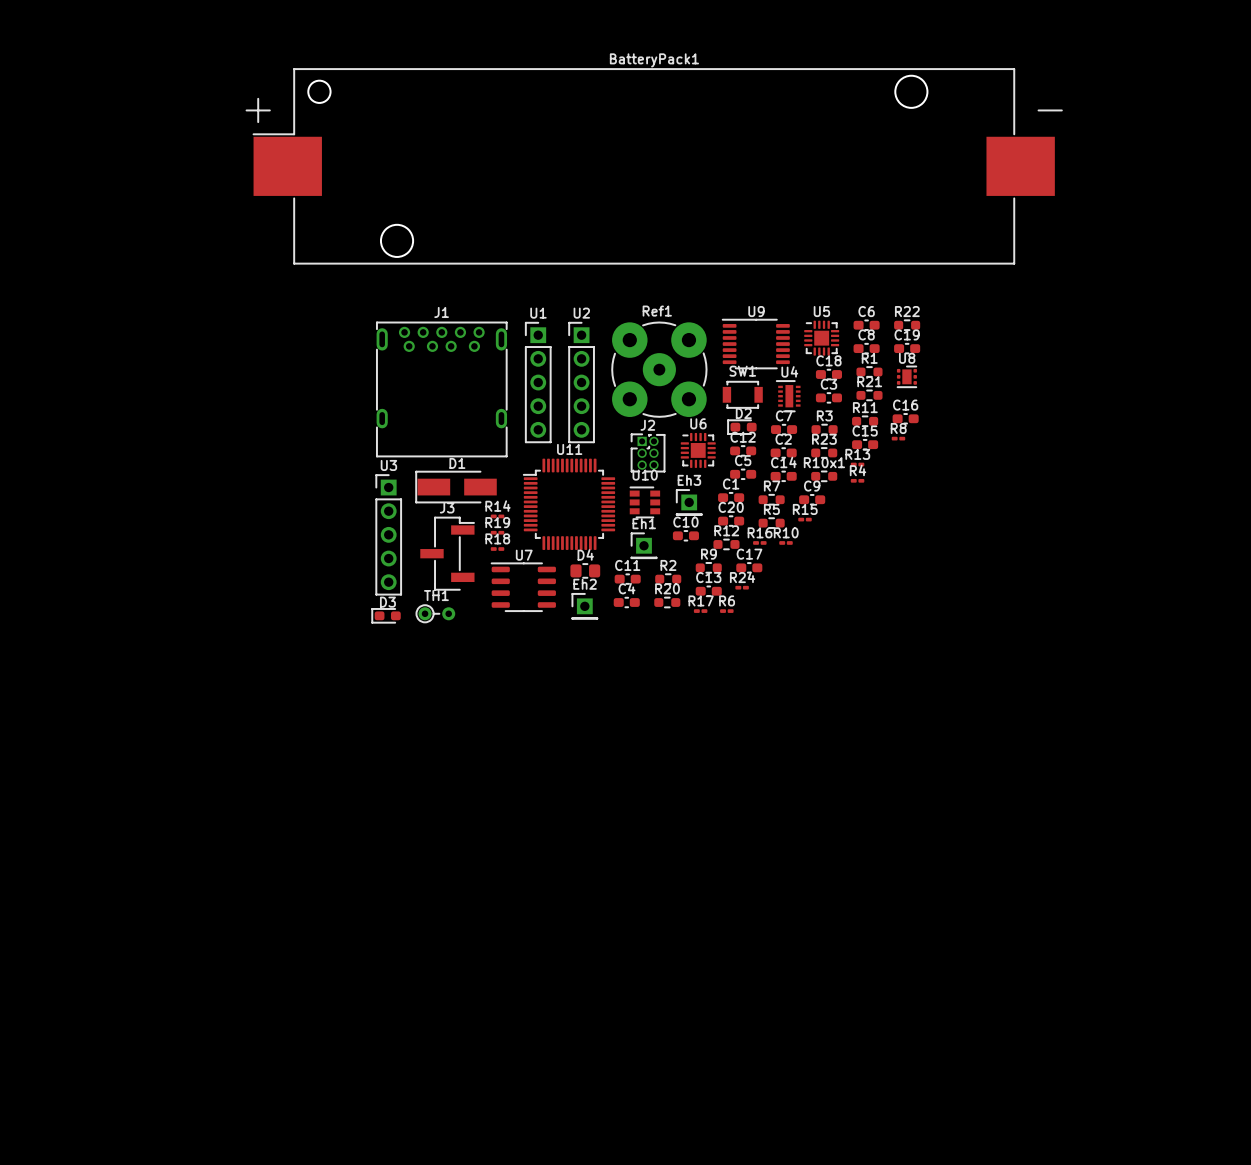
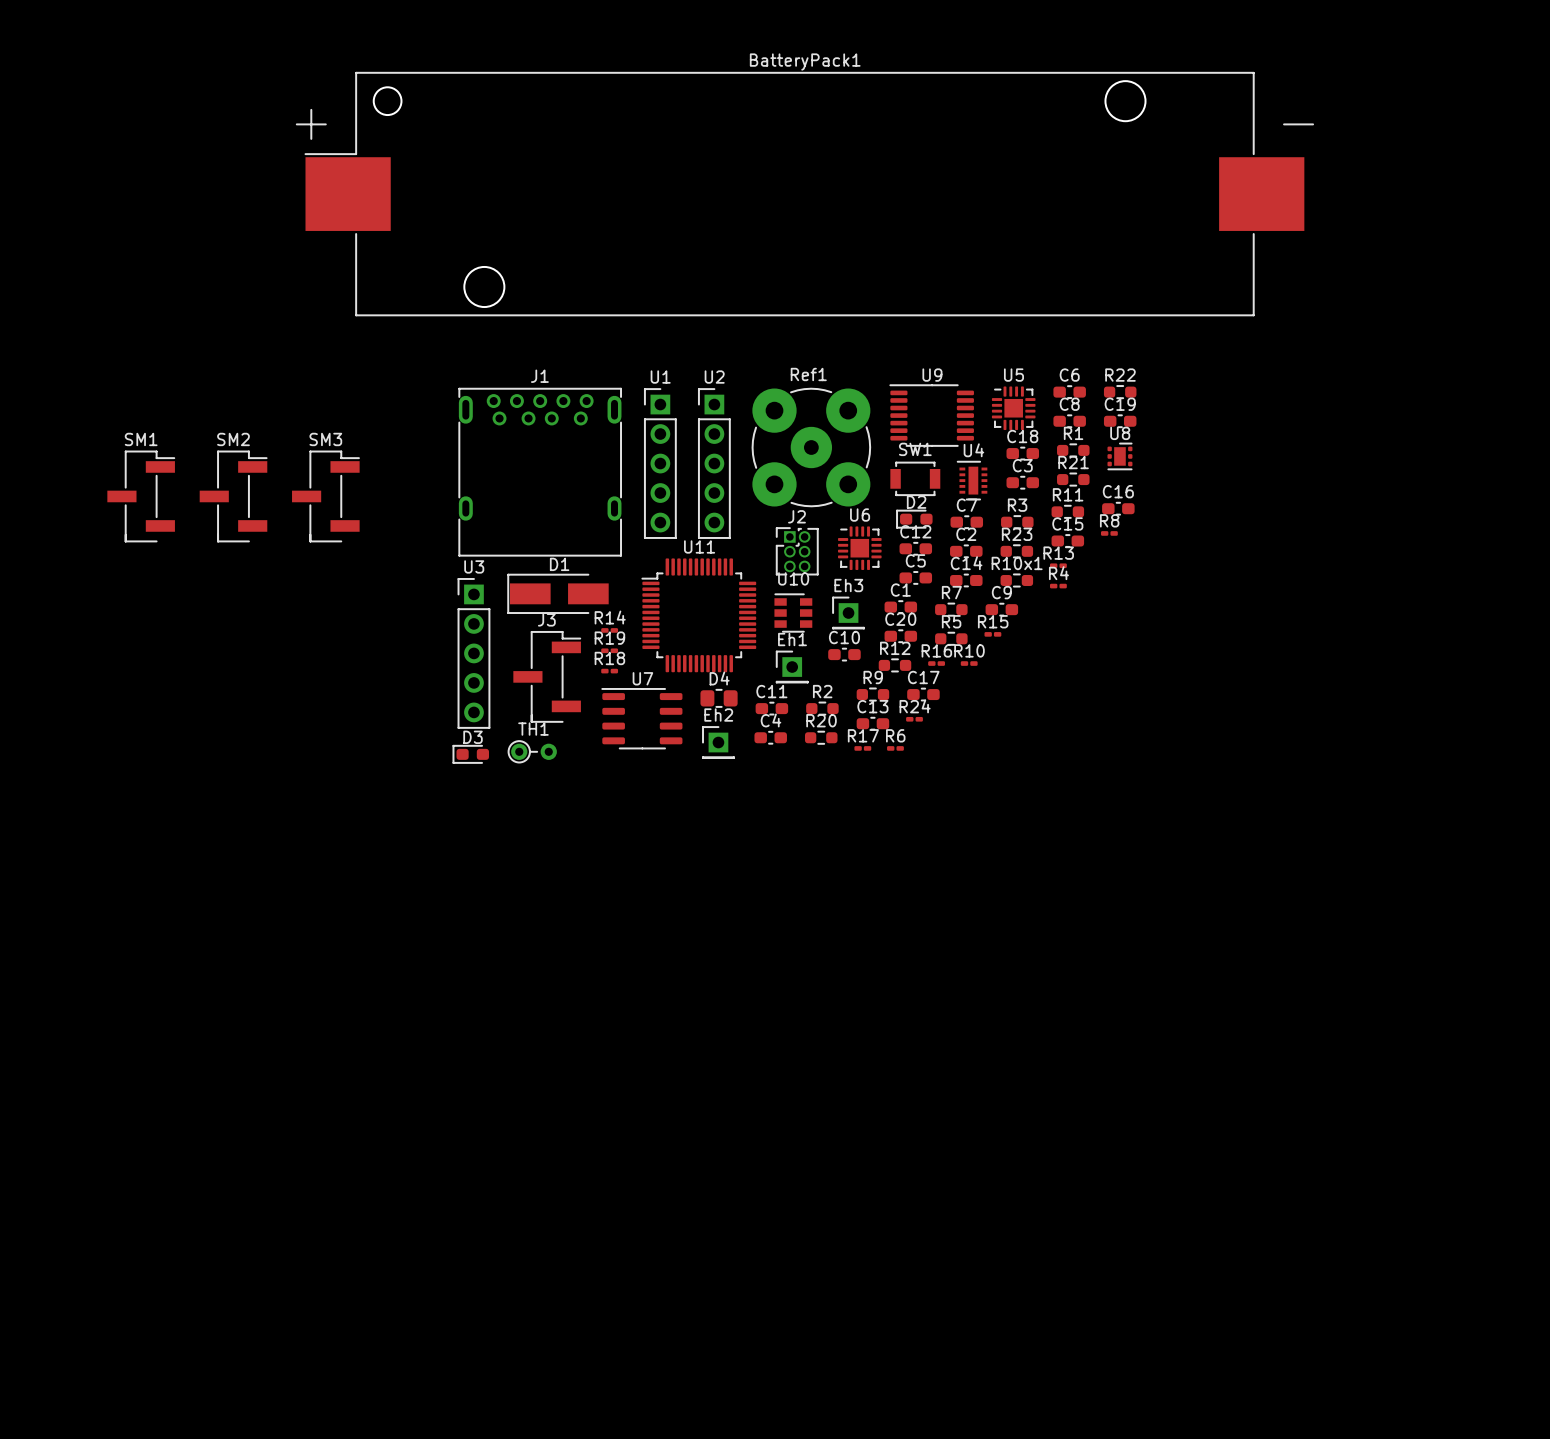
SM1: none -> (141, 496)
SM2: none -> (233, 496)
SM3: none -> (325, 496)

